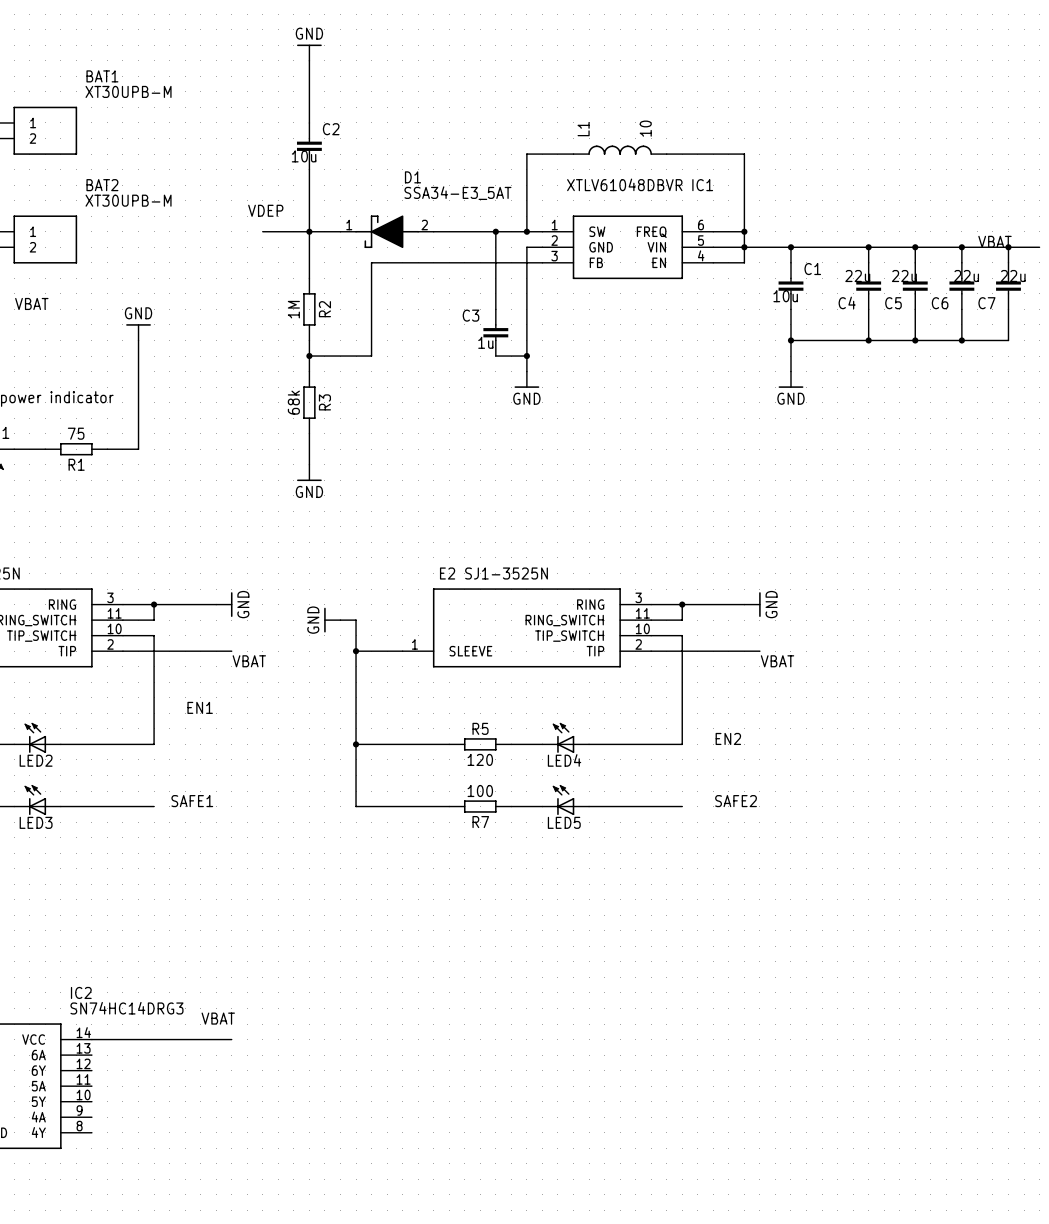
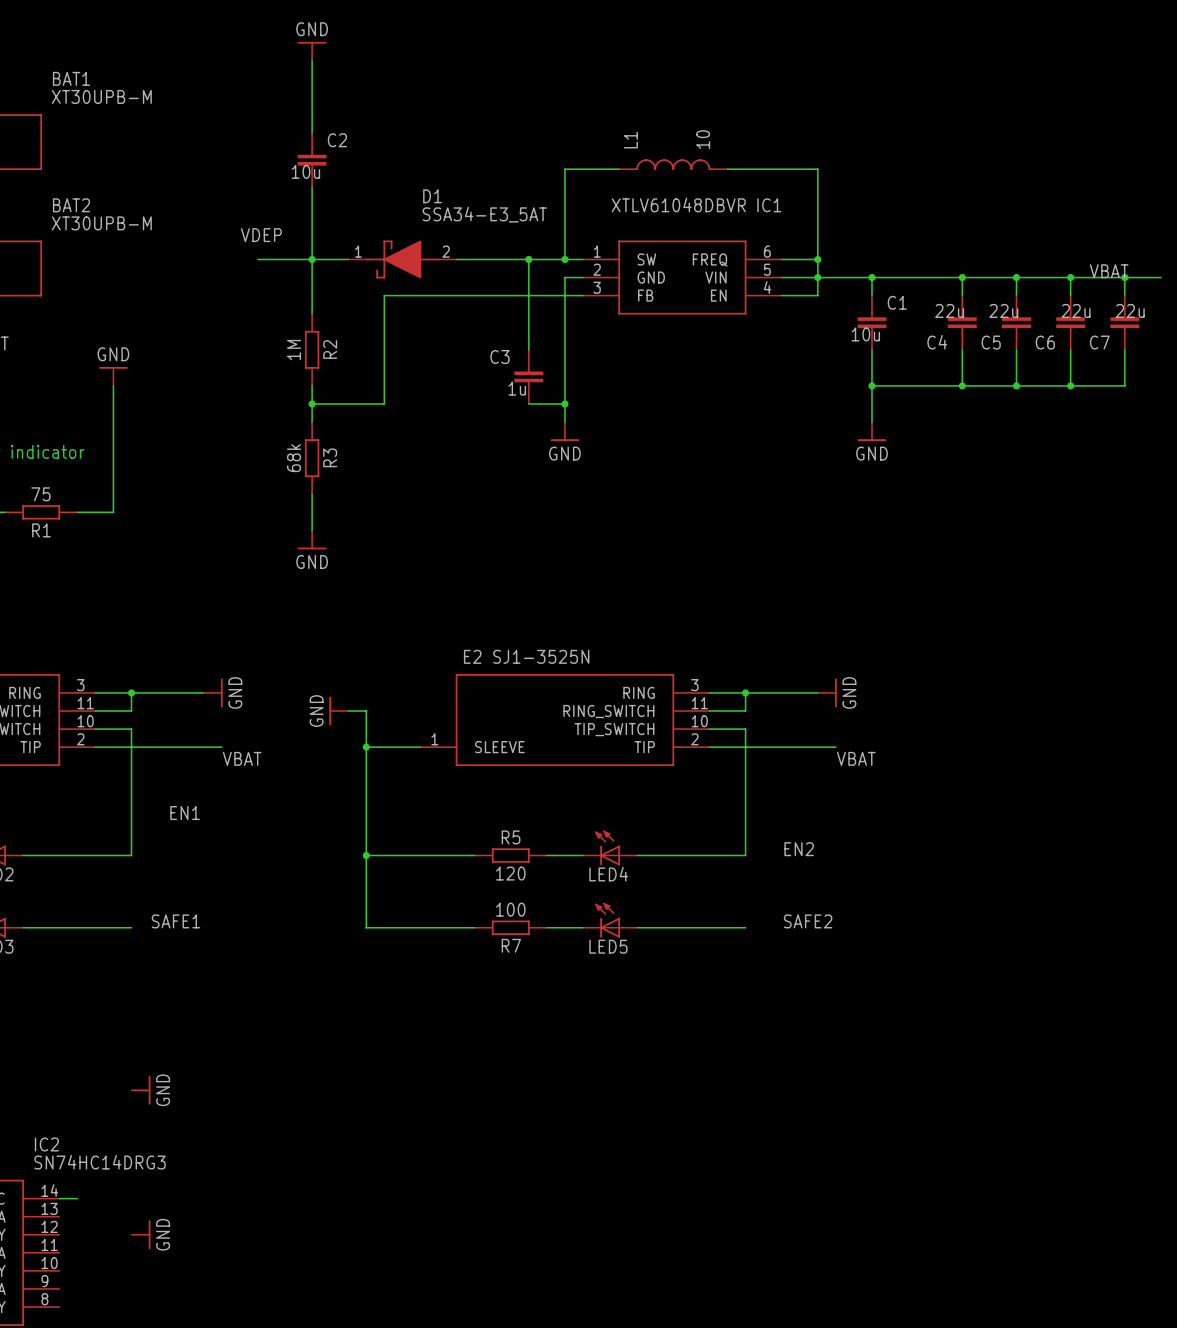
power symbol: none -> GND (140, 1090)
label: VBAT (218, 1018) -> none
wire: (107, 1039) (231, 1039) -> none
power symbol: none -> GND (140, 1234)

